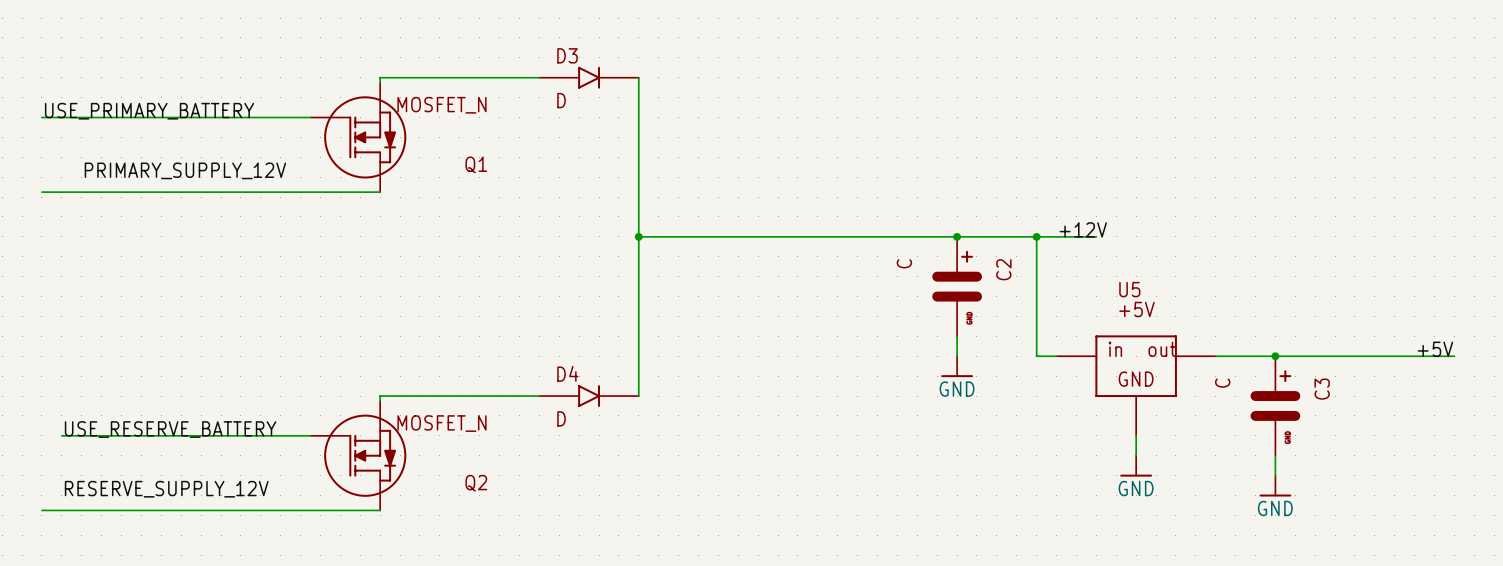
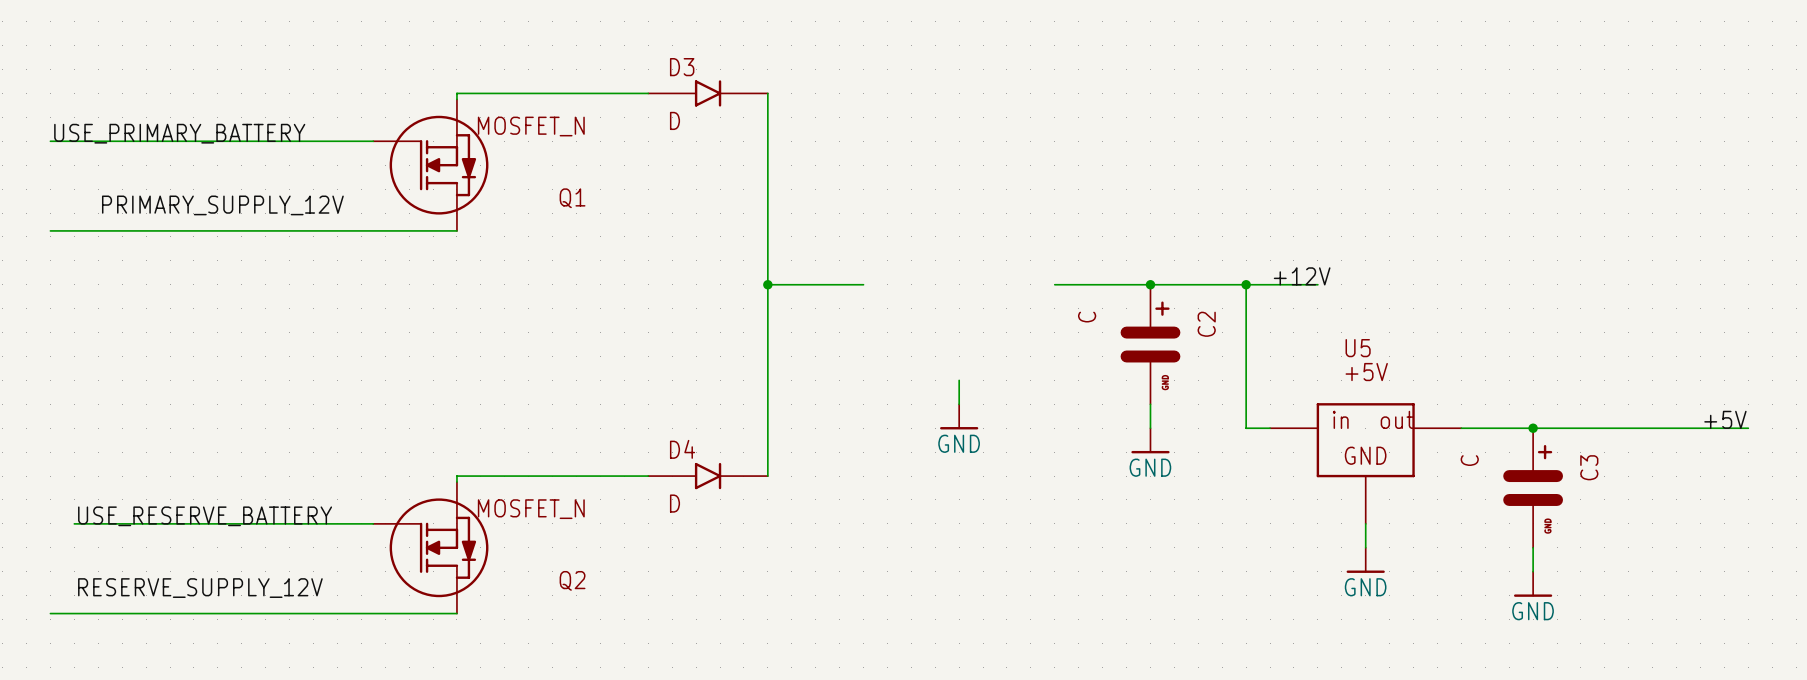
wire: (718, 236) (877, 236) -> none
wire: none -> (959, 380) (959, 404)
power symbol: none -> GND (959, 416)

